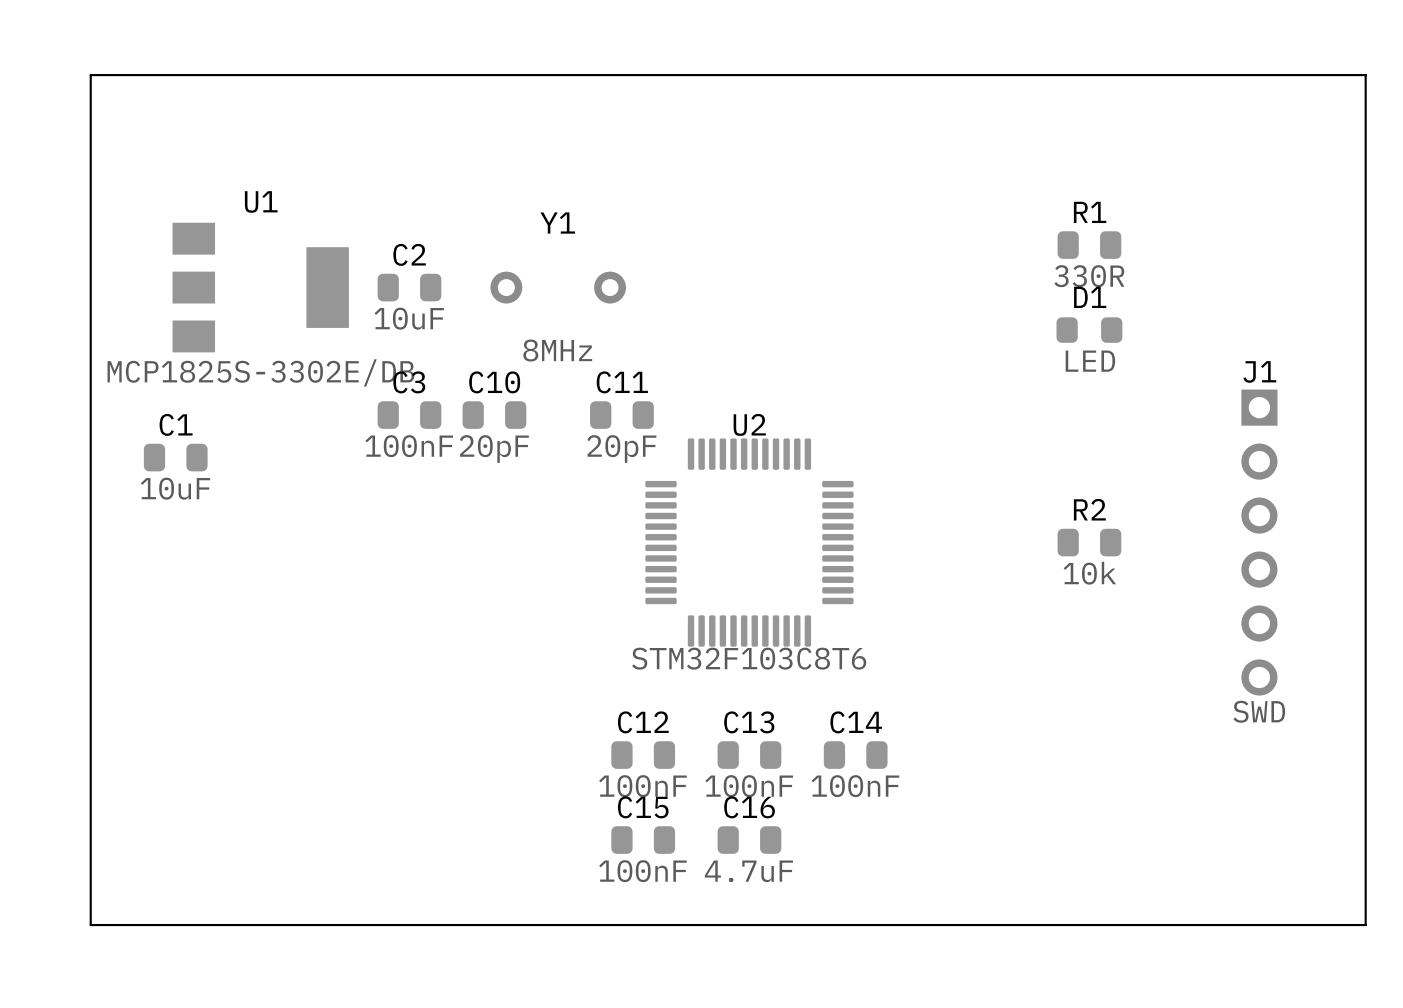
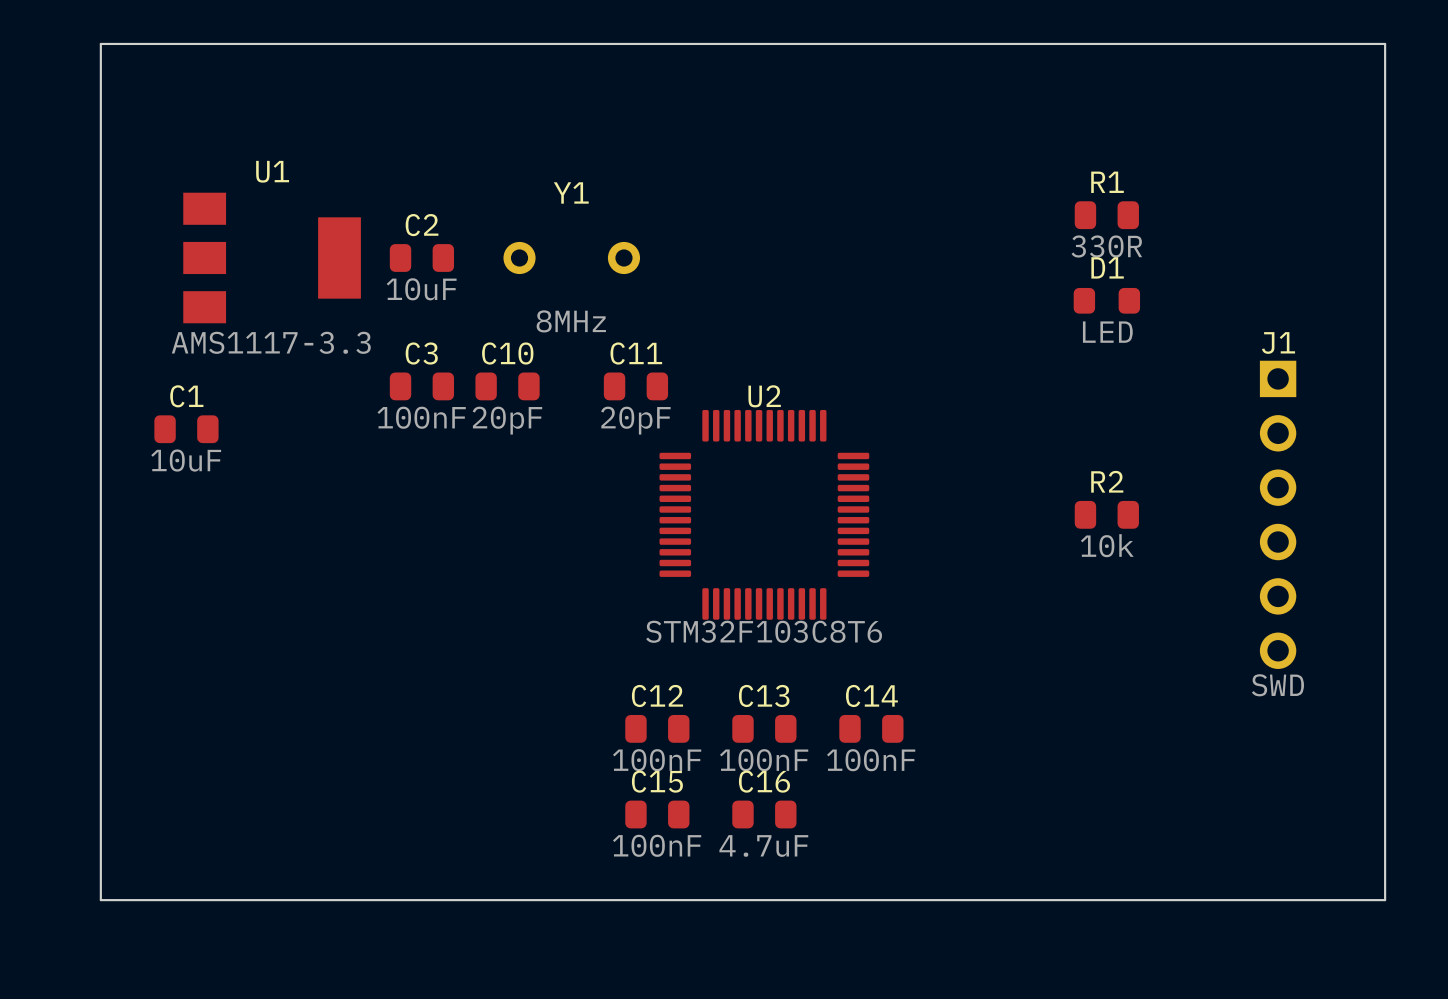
U1 value: MCP1825S-3302E/DB (260, 372) -> AMS1117-3.3 (271, 342)

